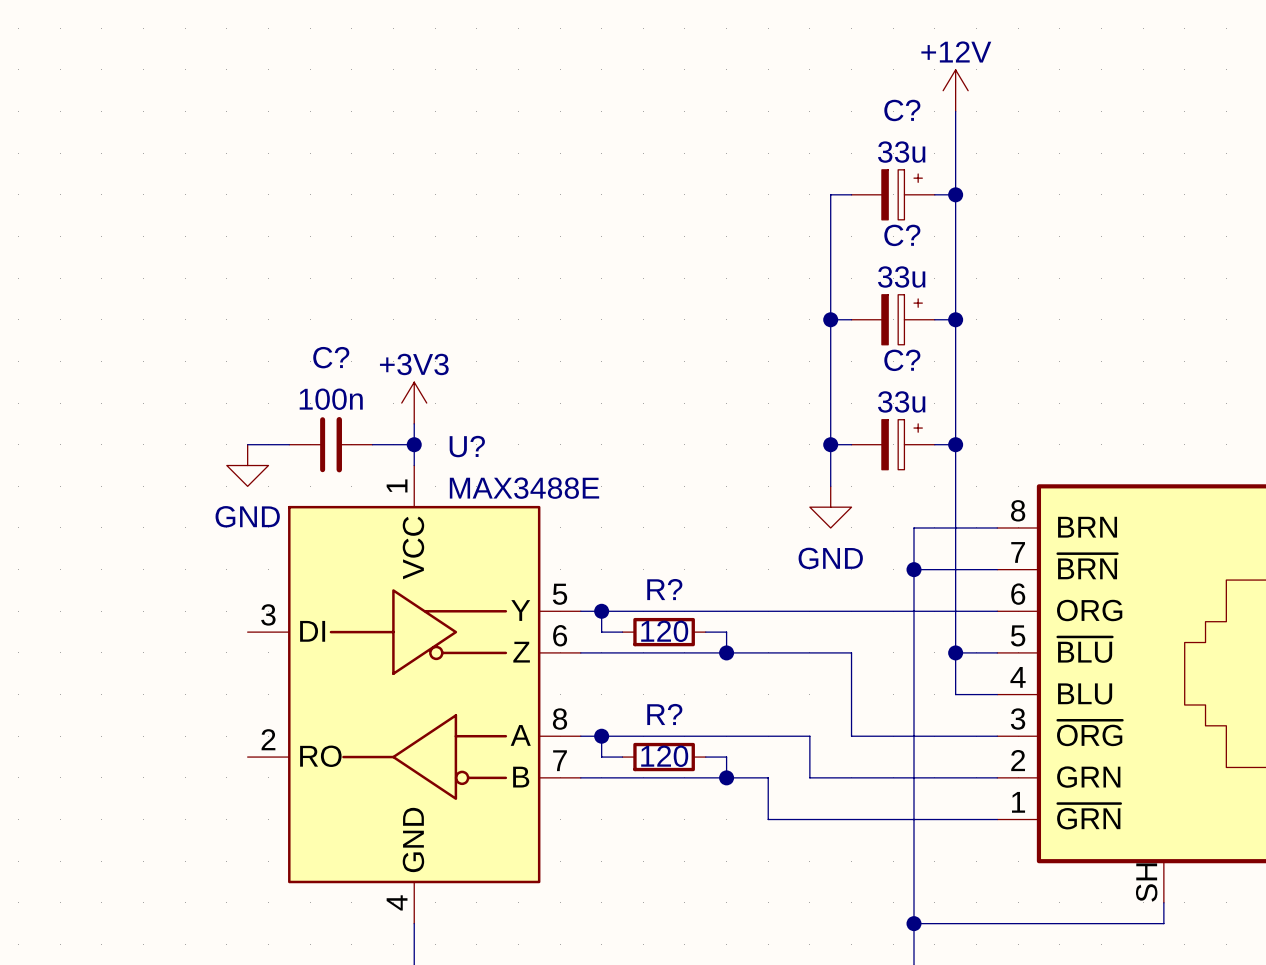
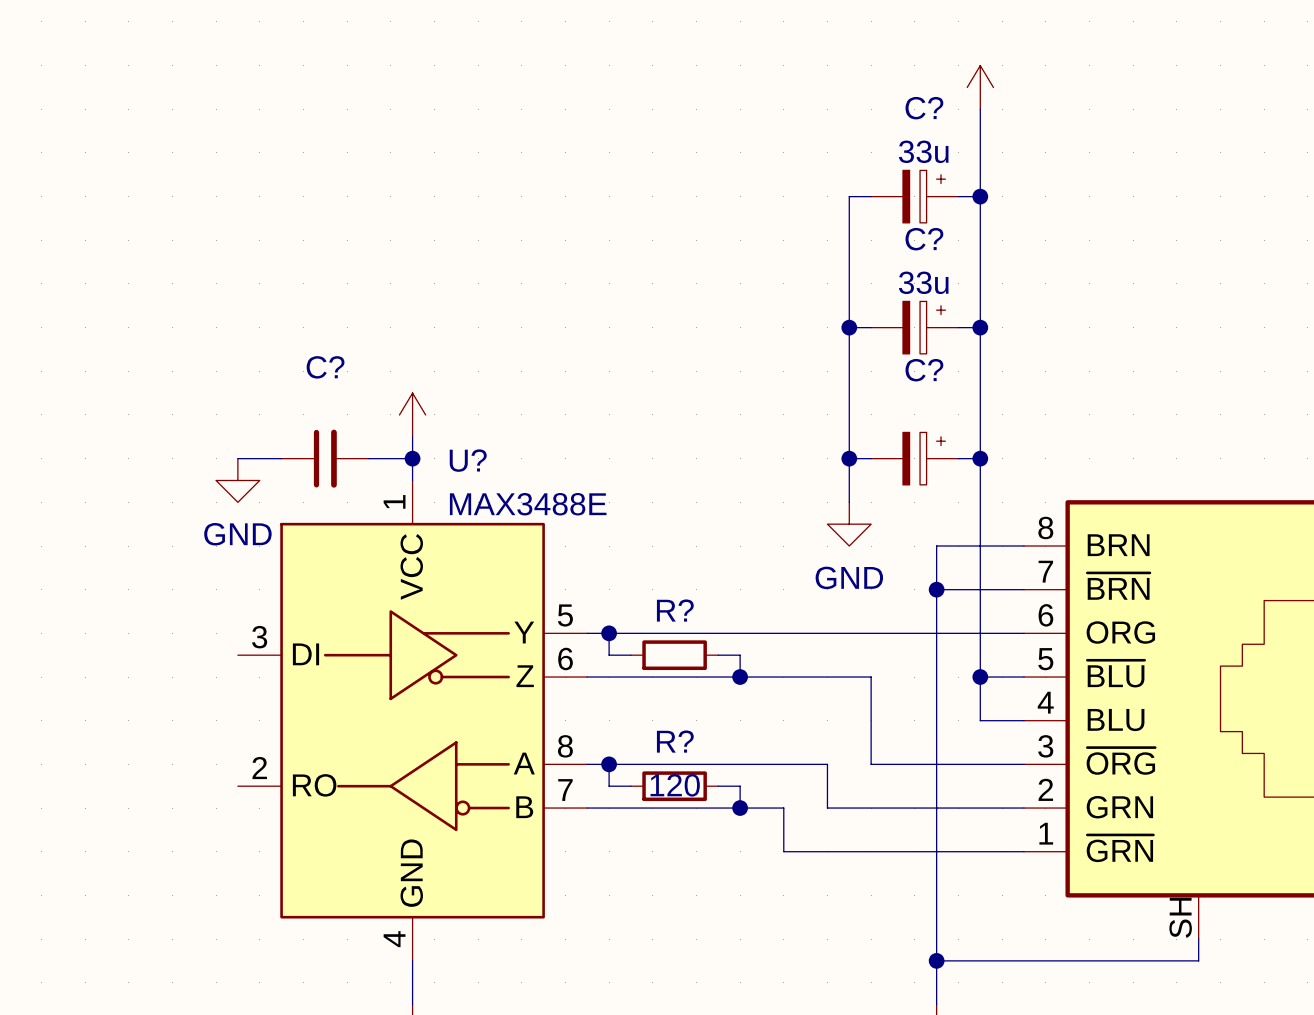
power symbol text: +12V (956, 51) -> none
power symbol text: +3V3 (414, 364) -> none
C? value: 100n (331, 399) -> none
C? value: 33u (901, 401) -> none
R? value: 120 (664, 631) -> none

